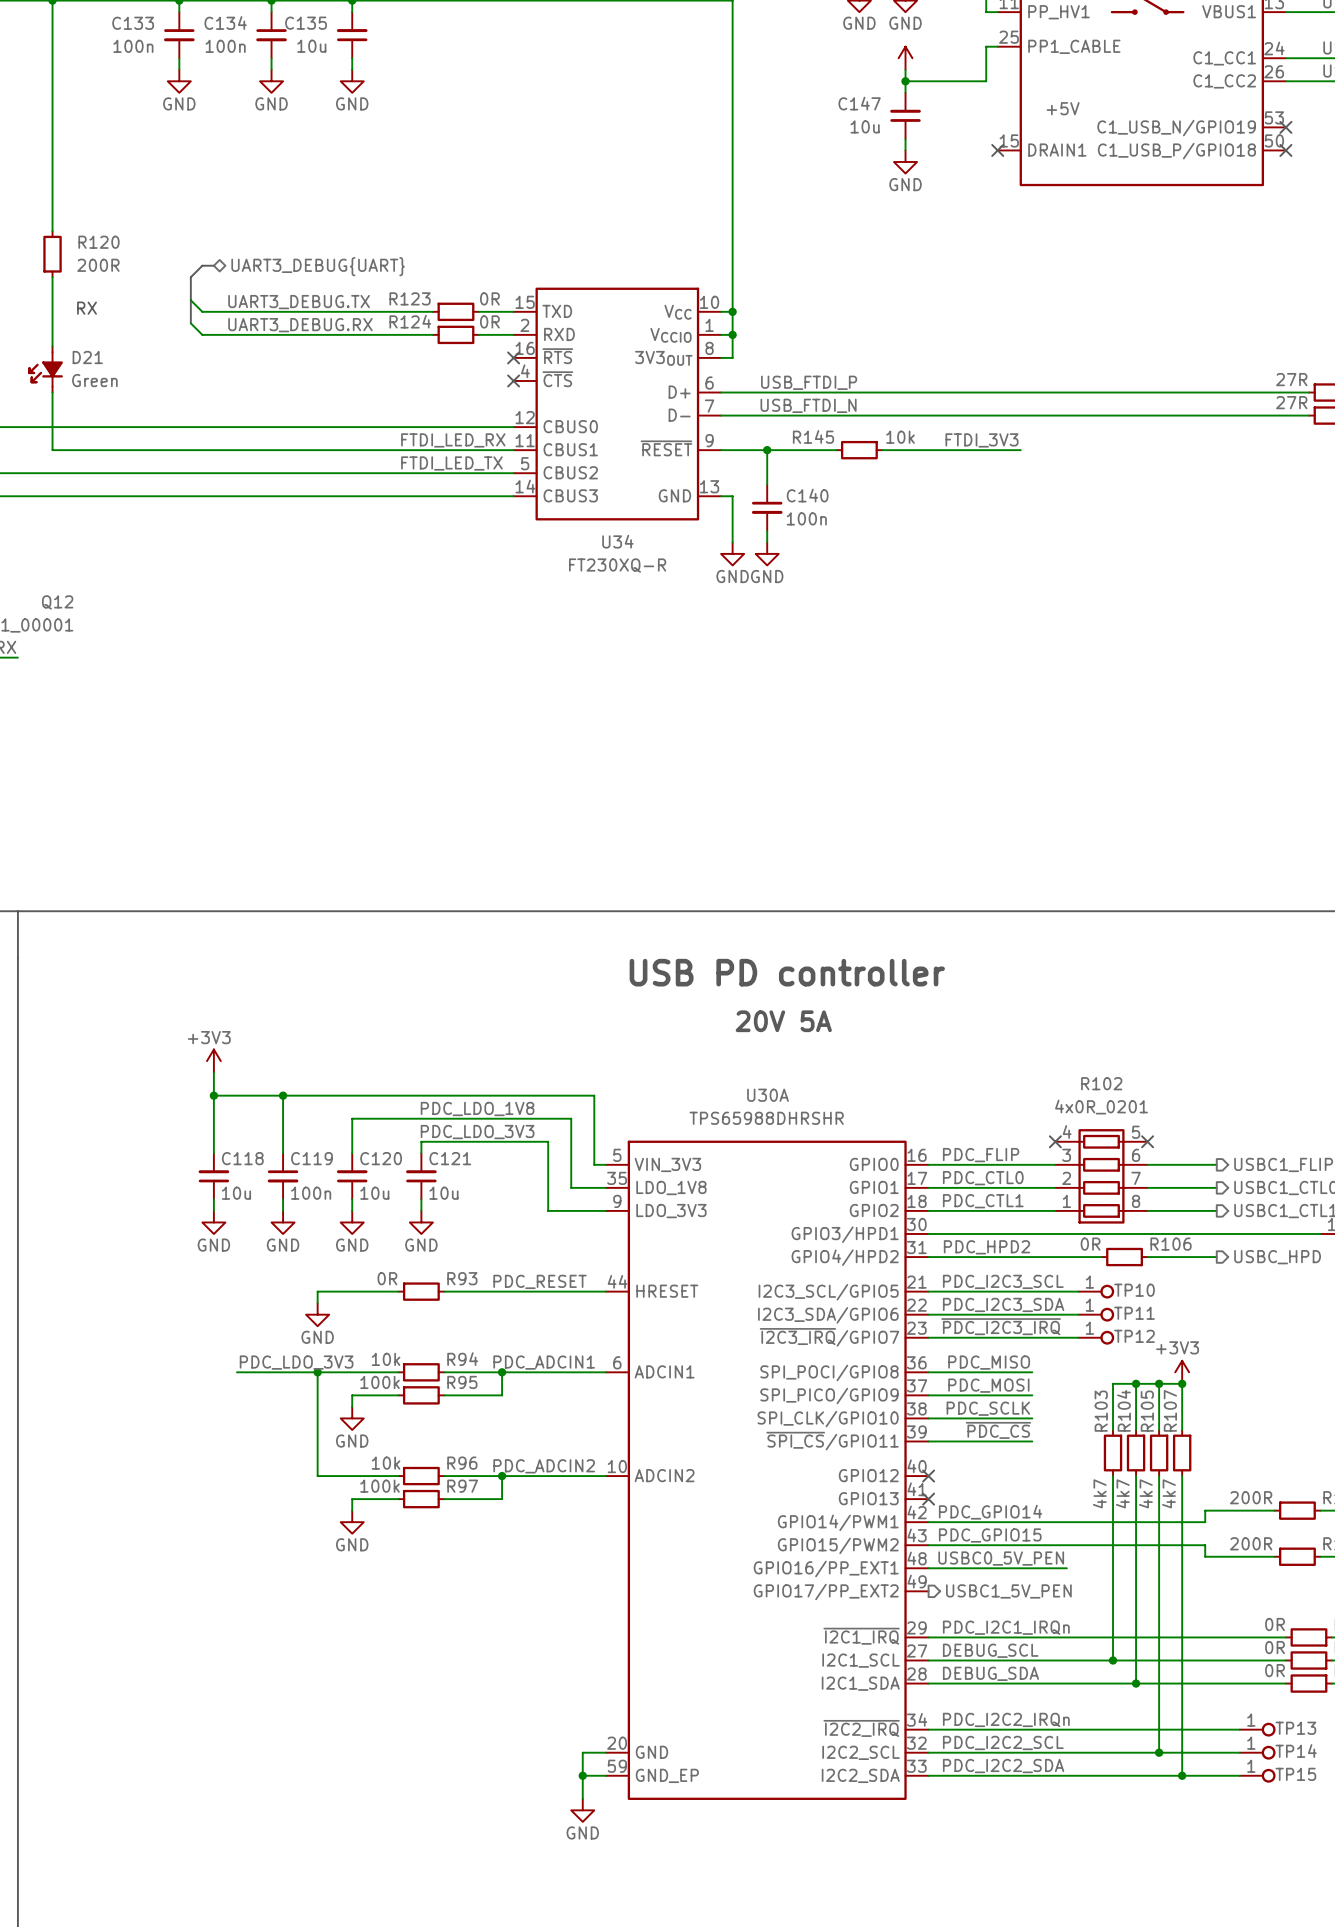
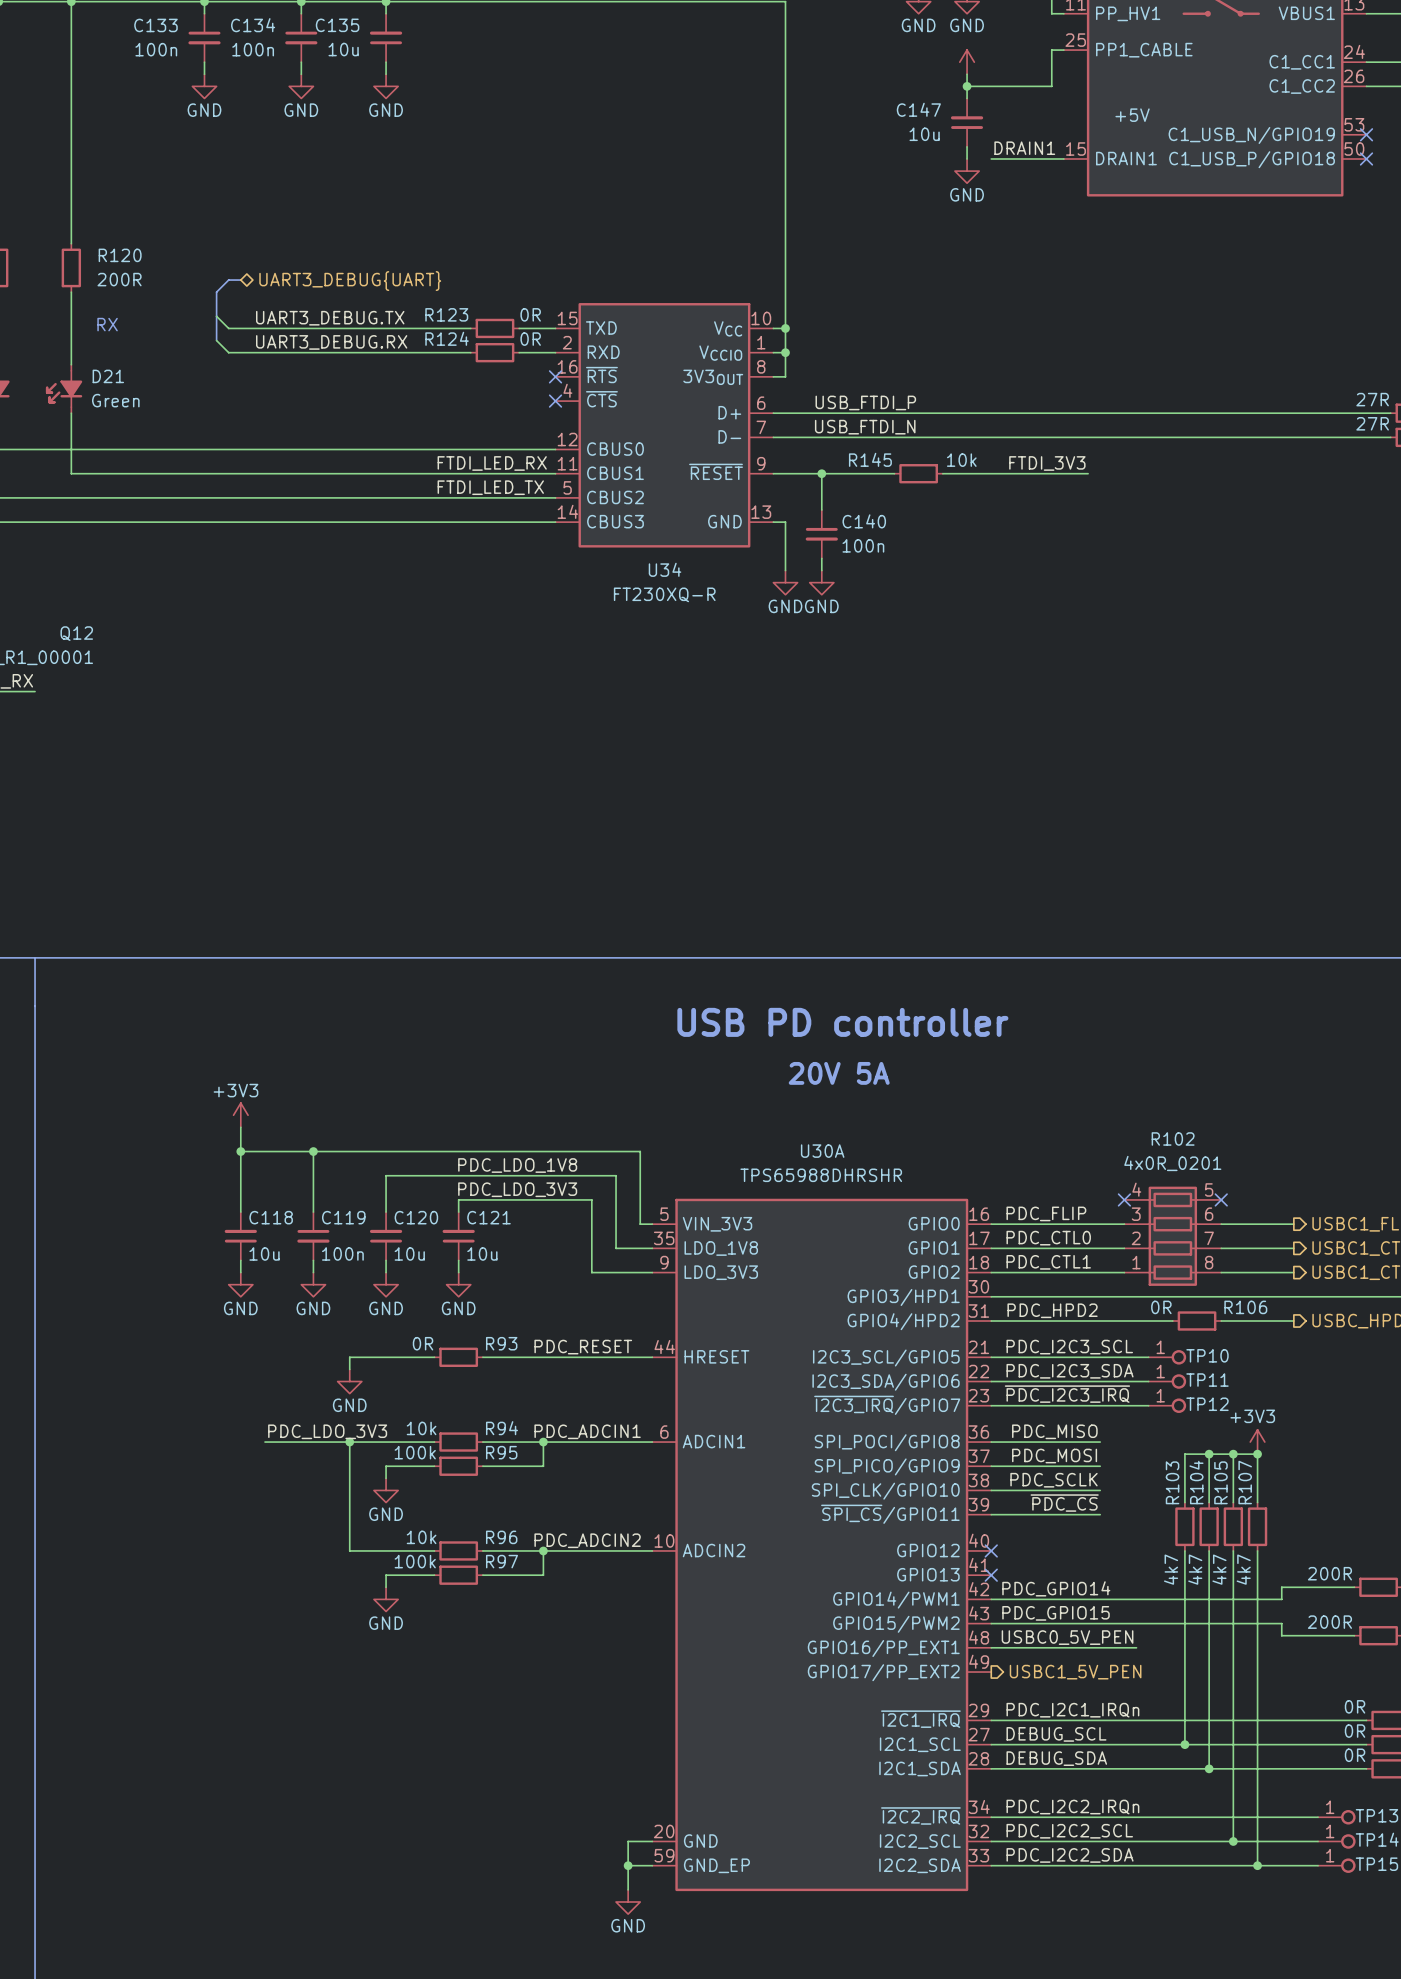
label: none -> DRAIN1 (1024, 148)
wire: none -> (991, 159) (1063, 159)
no-connect mark: (997, 150) -> none

